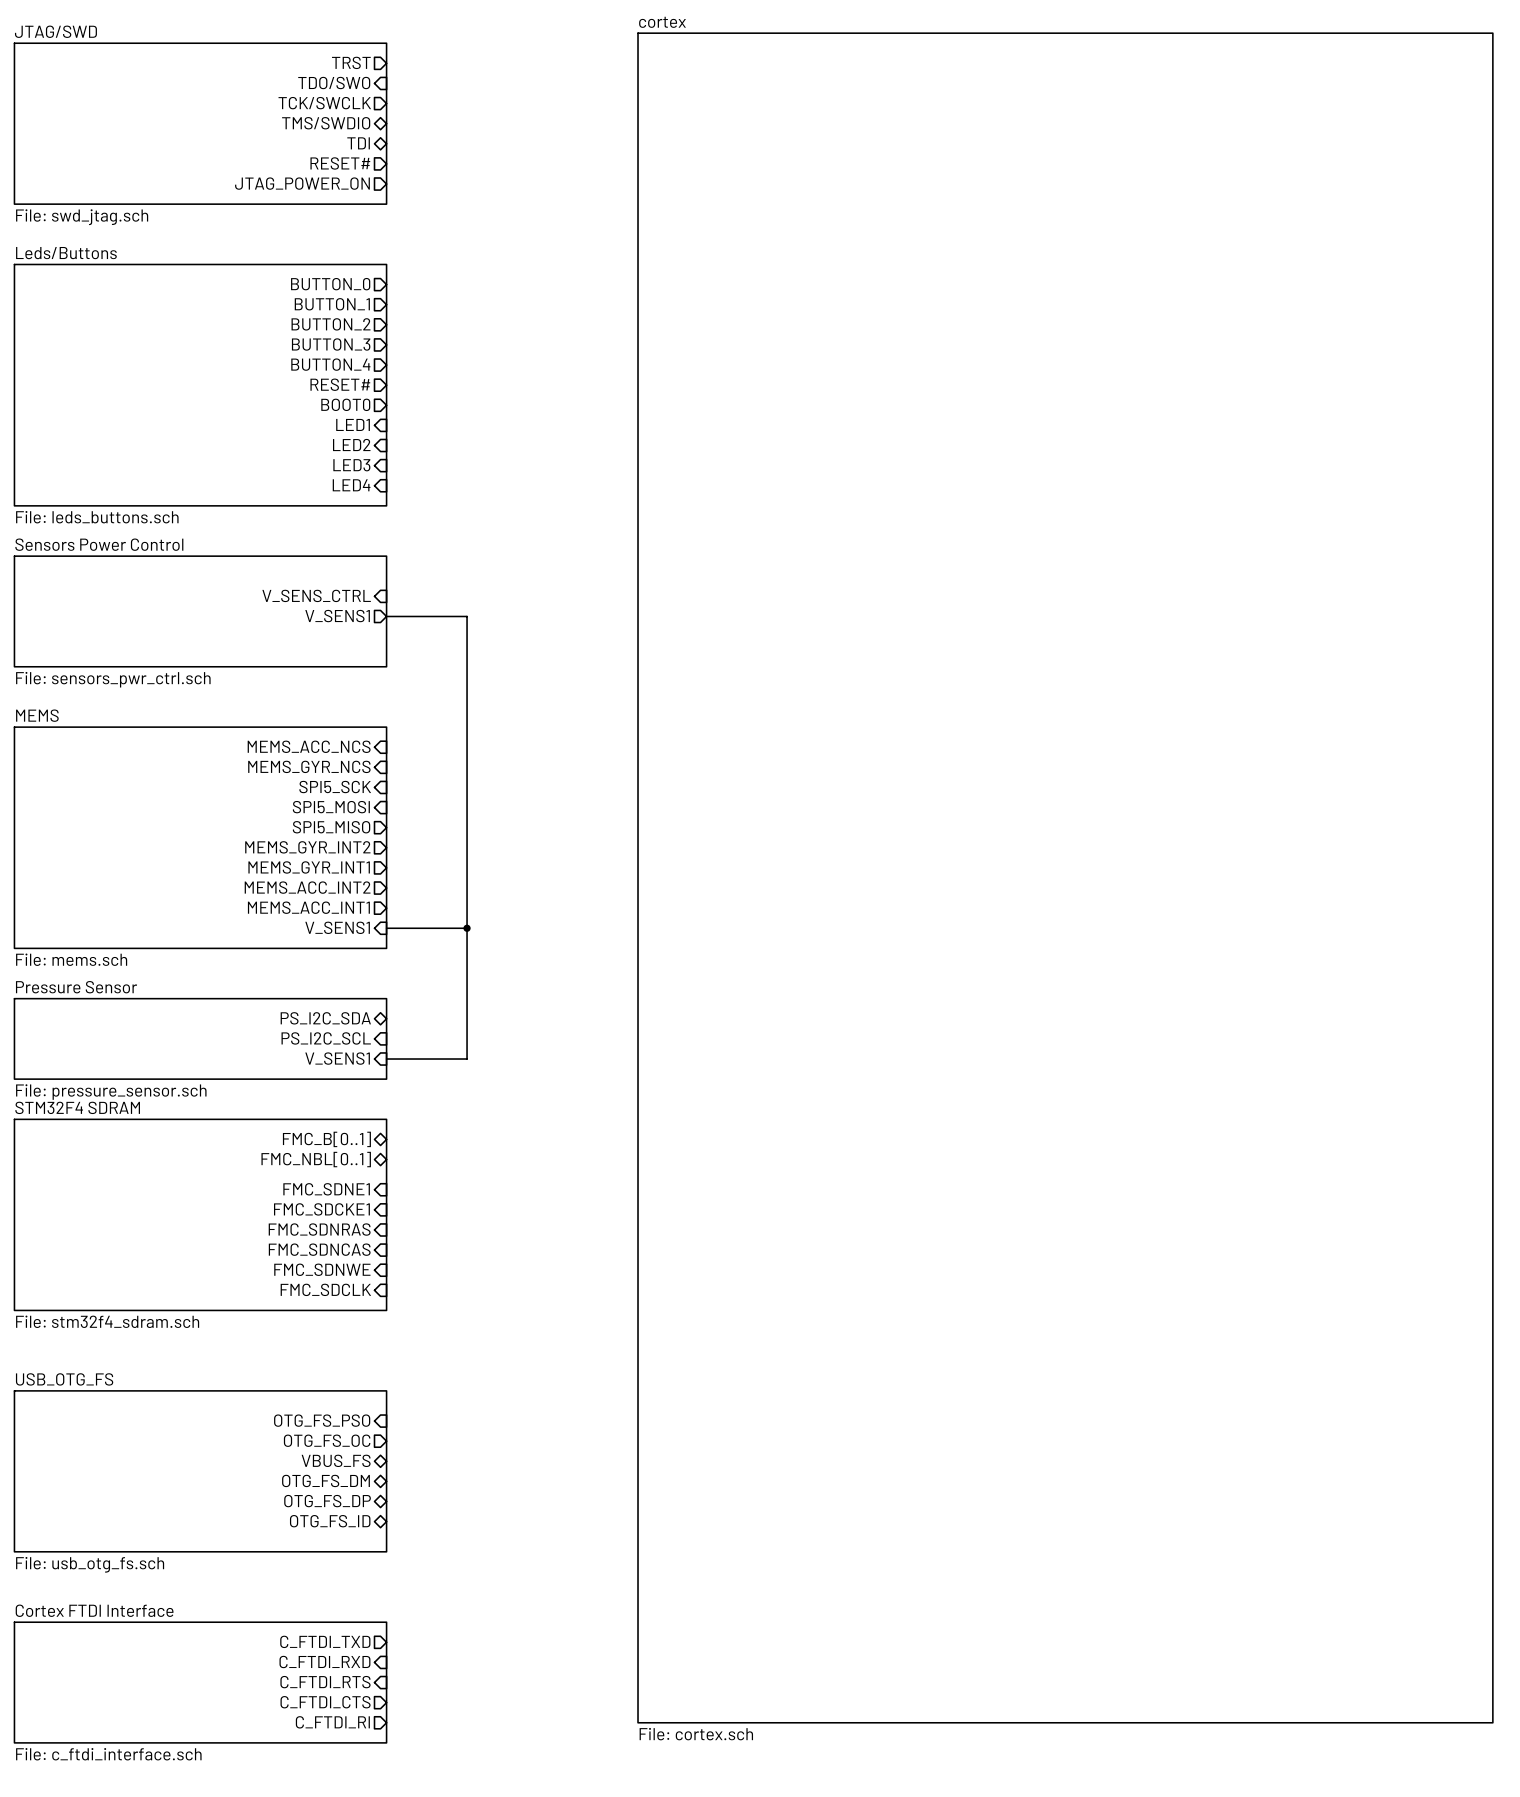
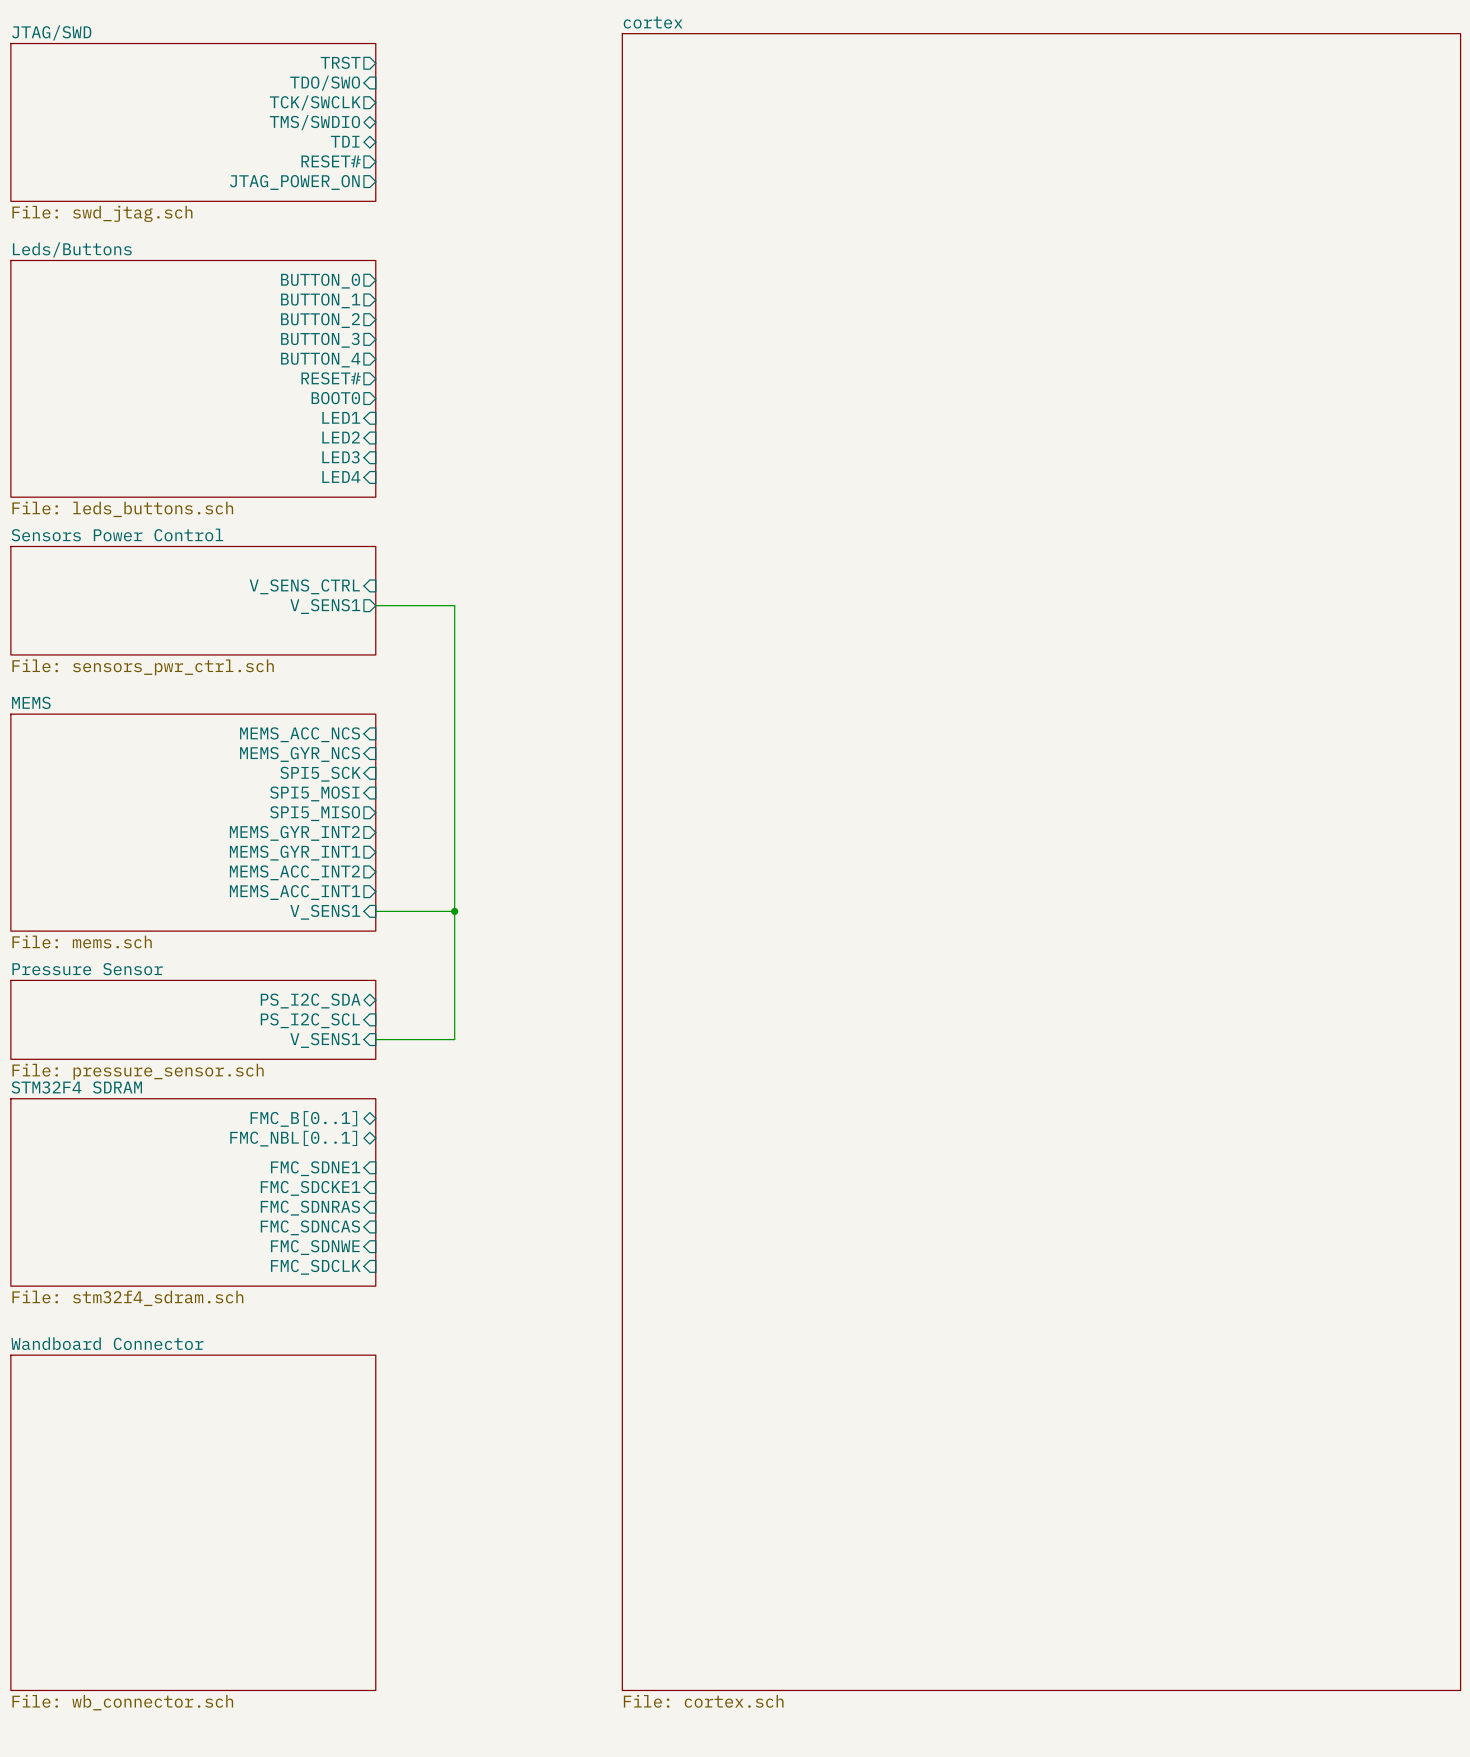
sheet pin: OTG_FS_PSO (322, 1420) -> none
sheet pin: OTG_FS_OC (327, 1440) -> none
sheet pin: VBUS_FS (336, 1460) -> none
sheet USB_OTG_FS: File: usb_otg_fs.sch (200, 1471) -> none
sheet pin: OTG_FS_DM (325, 1480) -> none
sheet pin: OTG_FS_DP (327, 1501) -> none
sheet pin: OTG_FS_ID (330, 1521) -> none
sheet Wandboard Connector: none -> File: wb_connector.sch (193, 1522)
sheet pin: C_FTDI_TXD (325, 1641) -> none
sheet pin: C_FTDI_RXD (324, 1662) -> none
sheet Cortex FTDI Interface: File: c_ftdi_interface.sch (200, 1682) -> none
sheet pin: C_FTDI_RTS (325, 1682) -> none
sheet pin: C_FTDI_CTS (325, 1702) -> none
sheet pin: C_FTDI_RI (332, 1722) -> none

